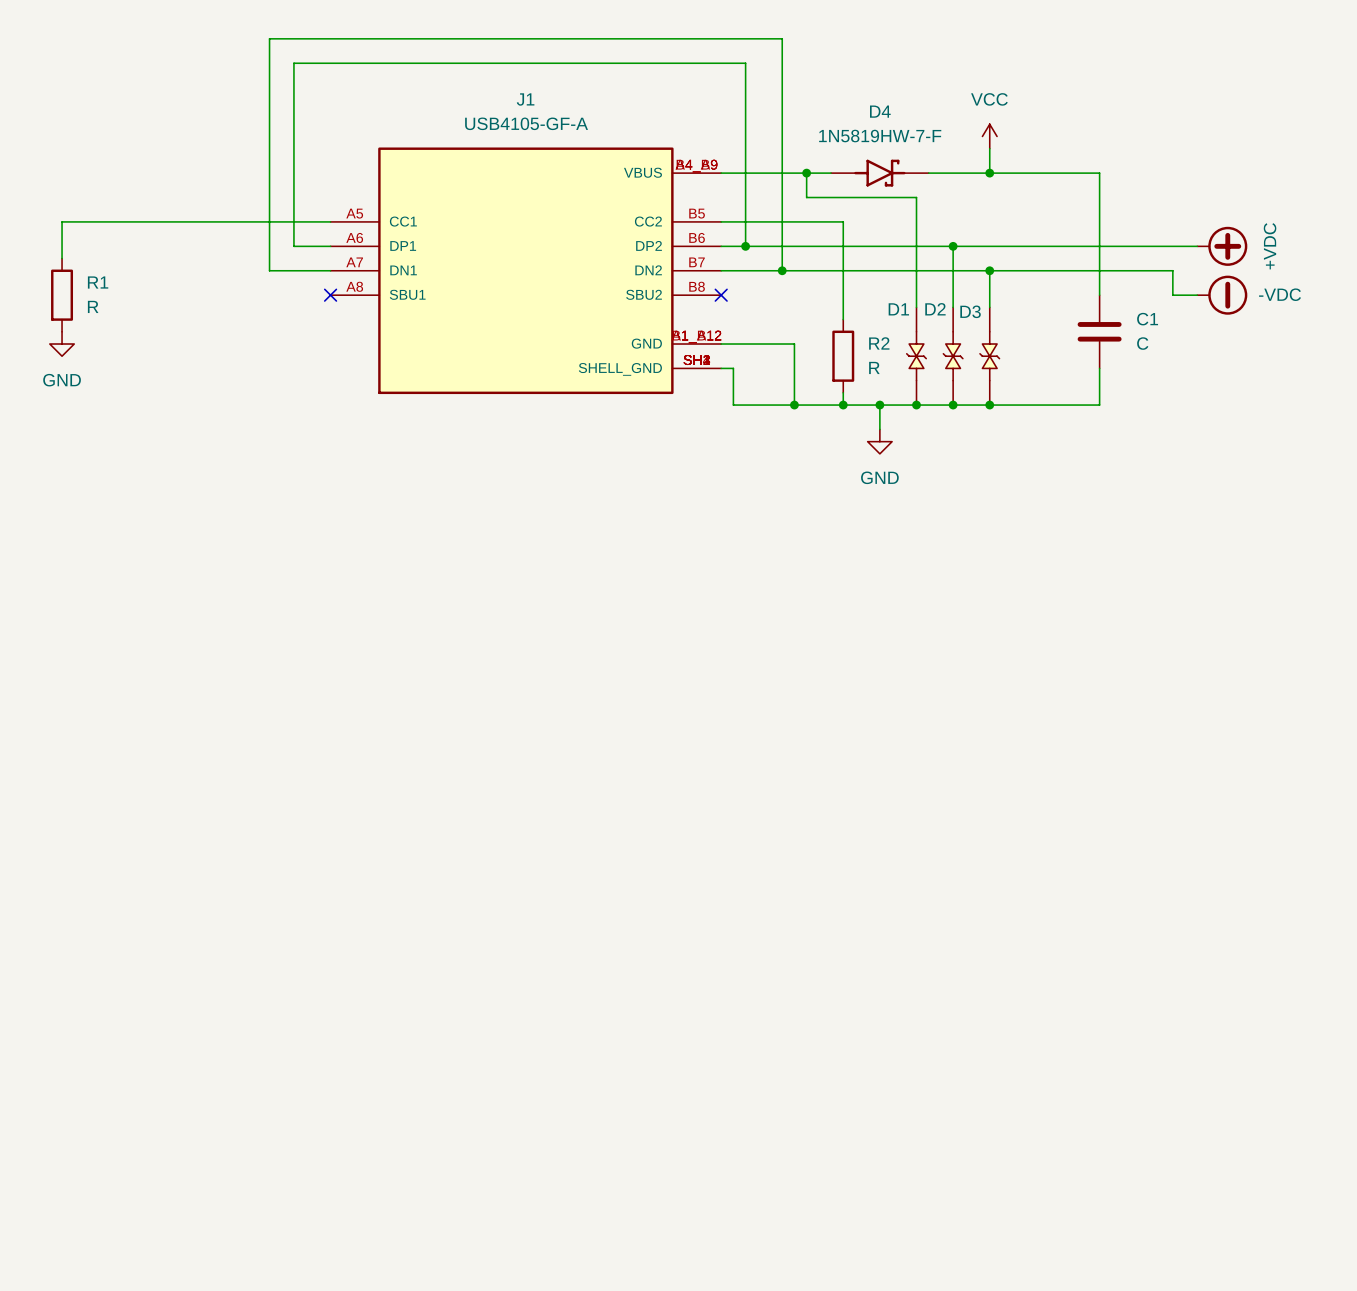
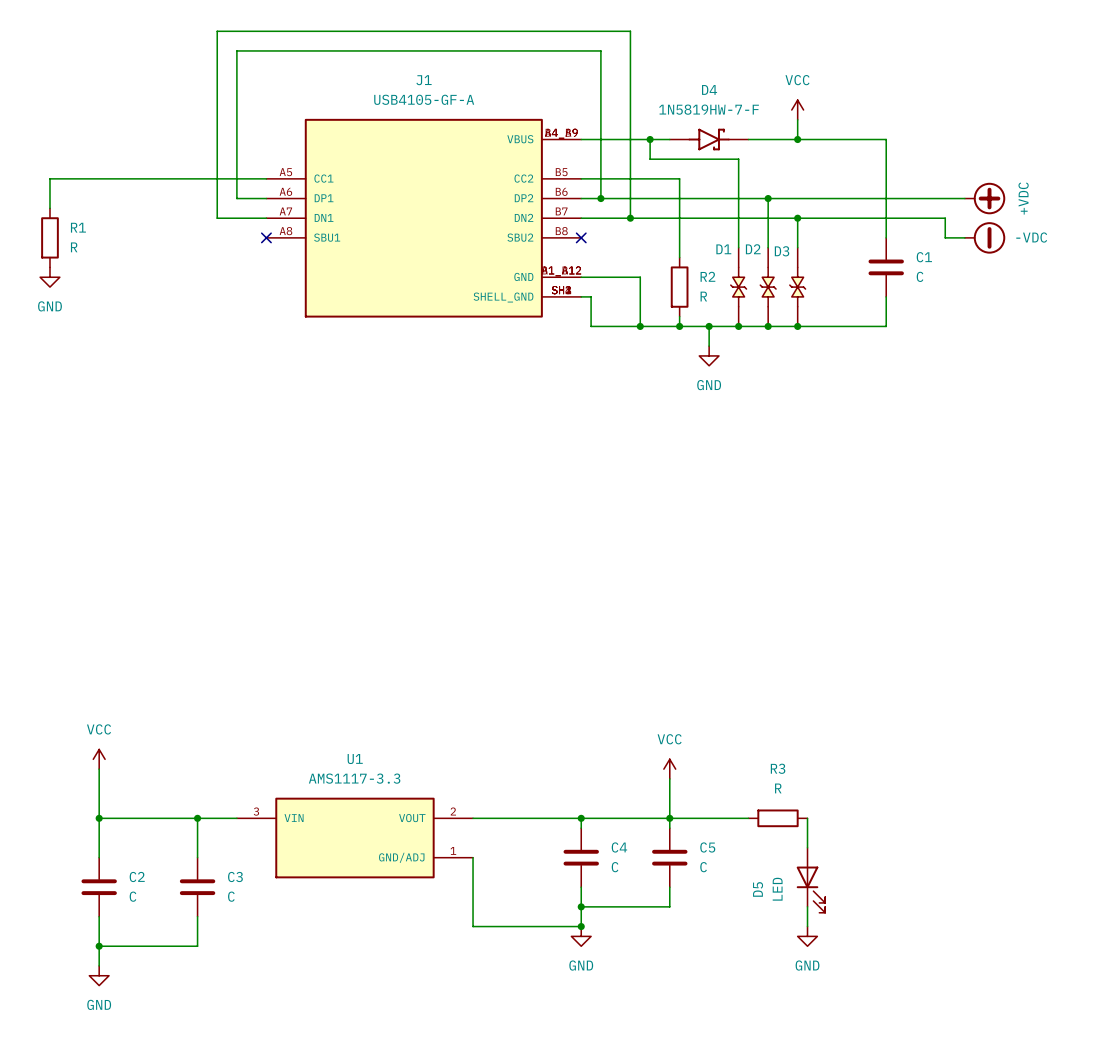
power symbol: none -> VCC (99, 759)
wire: none -> (99, 769) (99, 857)
power symbol: none -> VCC (669, 769)
wire: none -> (669, 778) (669, 828)
wire: none -> (99, 818) (236, 818)
junction: none -> (99, 818)
wire: none -> (197, 818) (197, 857)
junction: none -> (197, 818)
wire: none -> (473, 818) (748, 818)
wire: none -> (581, 818) (581, 828)
junction: none -> (581, 818)
junction: none -> (669, 818)
R3: none -> R (778, 818)
wire: none -> (807, 818) (807, 847)
U1: none -> AMS1117-3.3 (354, 838)
wire: none -> (473, 857) (473, 926) (581, 926) (581, 887)
C4: none -> C (581, 857)
C5: none -> C (669, 857)
D5: none -> LED (810, 880)
C2: none -> C (99, 887)
C3: none -> C (197, 887)
wire: none -> (669, 887) (669, 906) (581, 906)
junction: none -> (581, 906)
wire: none -> (807, 906) (807, 926)
wire: none -> (99, 916) (99, 965)
wire: none -> (197, 916) (197, 946) (99, 946)
junction: none -> (581, 926)
power symbol: none -> GND (581, 936)
power symbol: none -> GND (807, 936)
junction: none -> (99, 946)
power symbol: none -> GND (99, 975)

